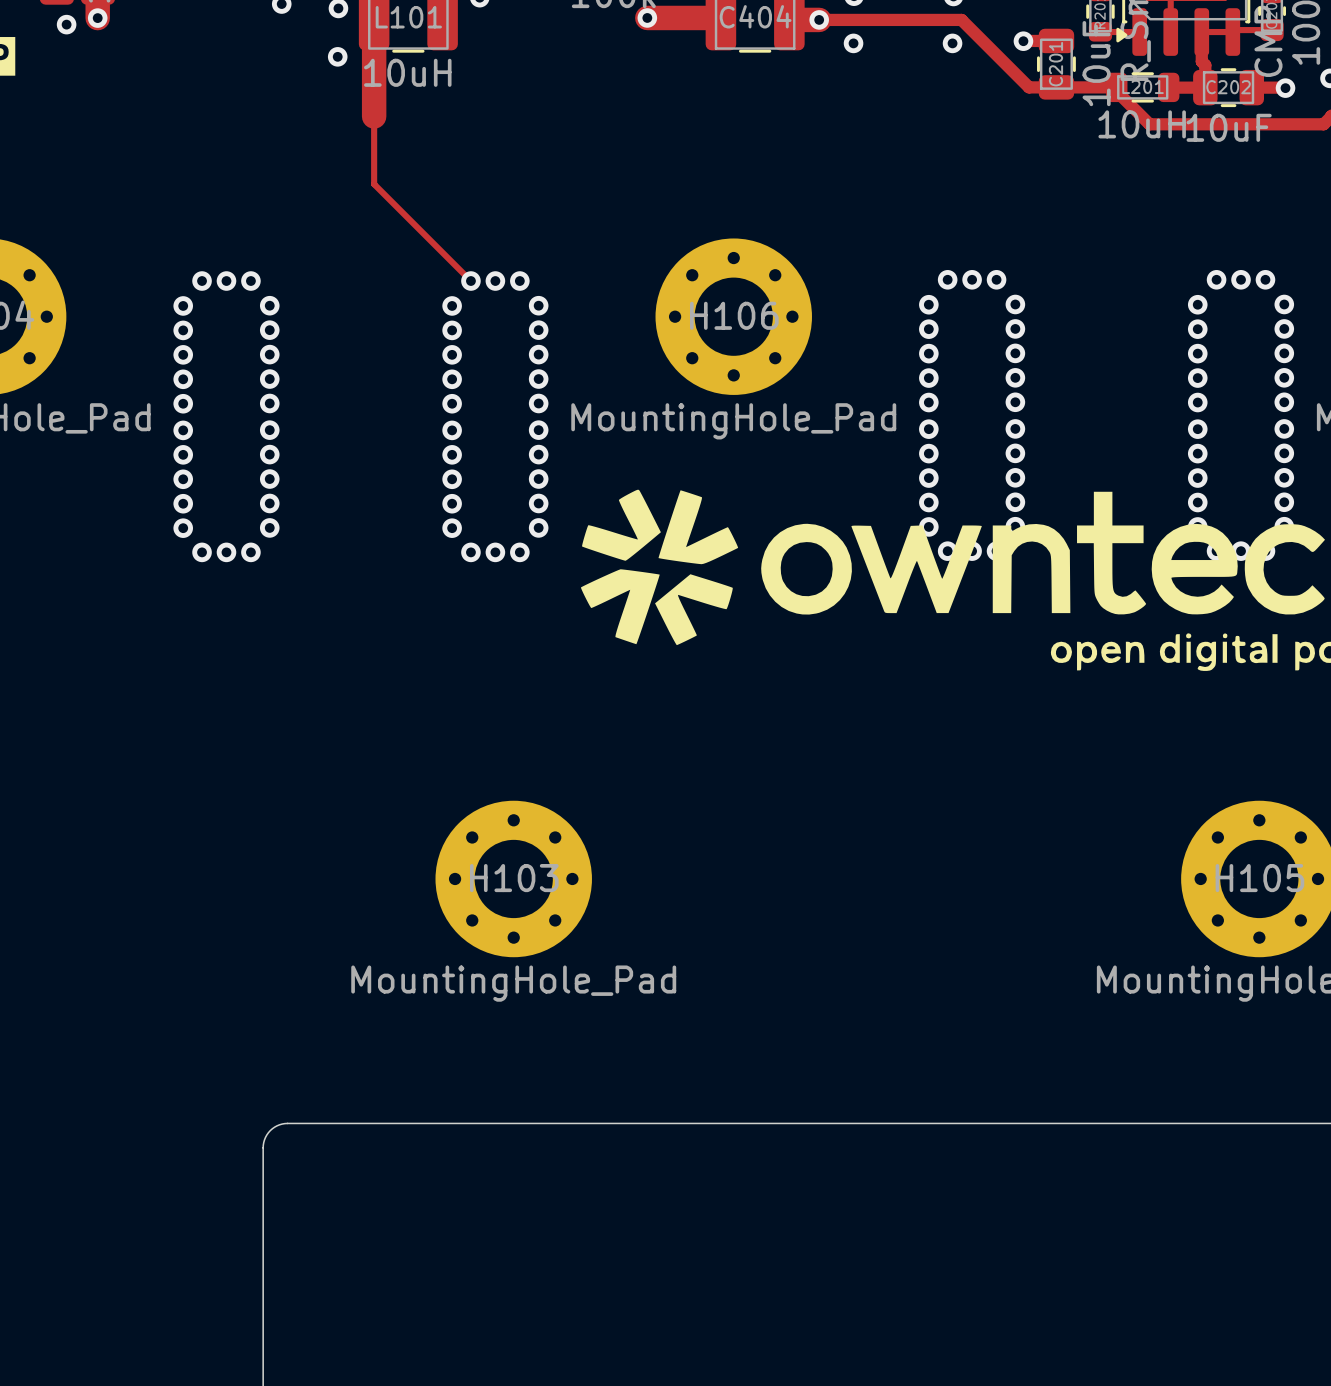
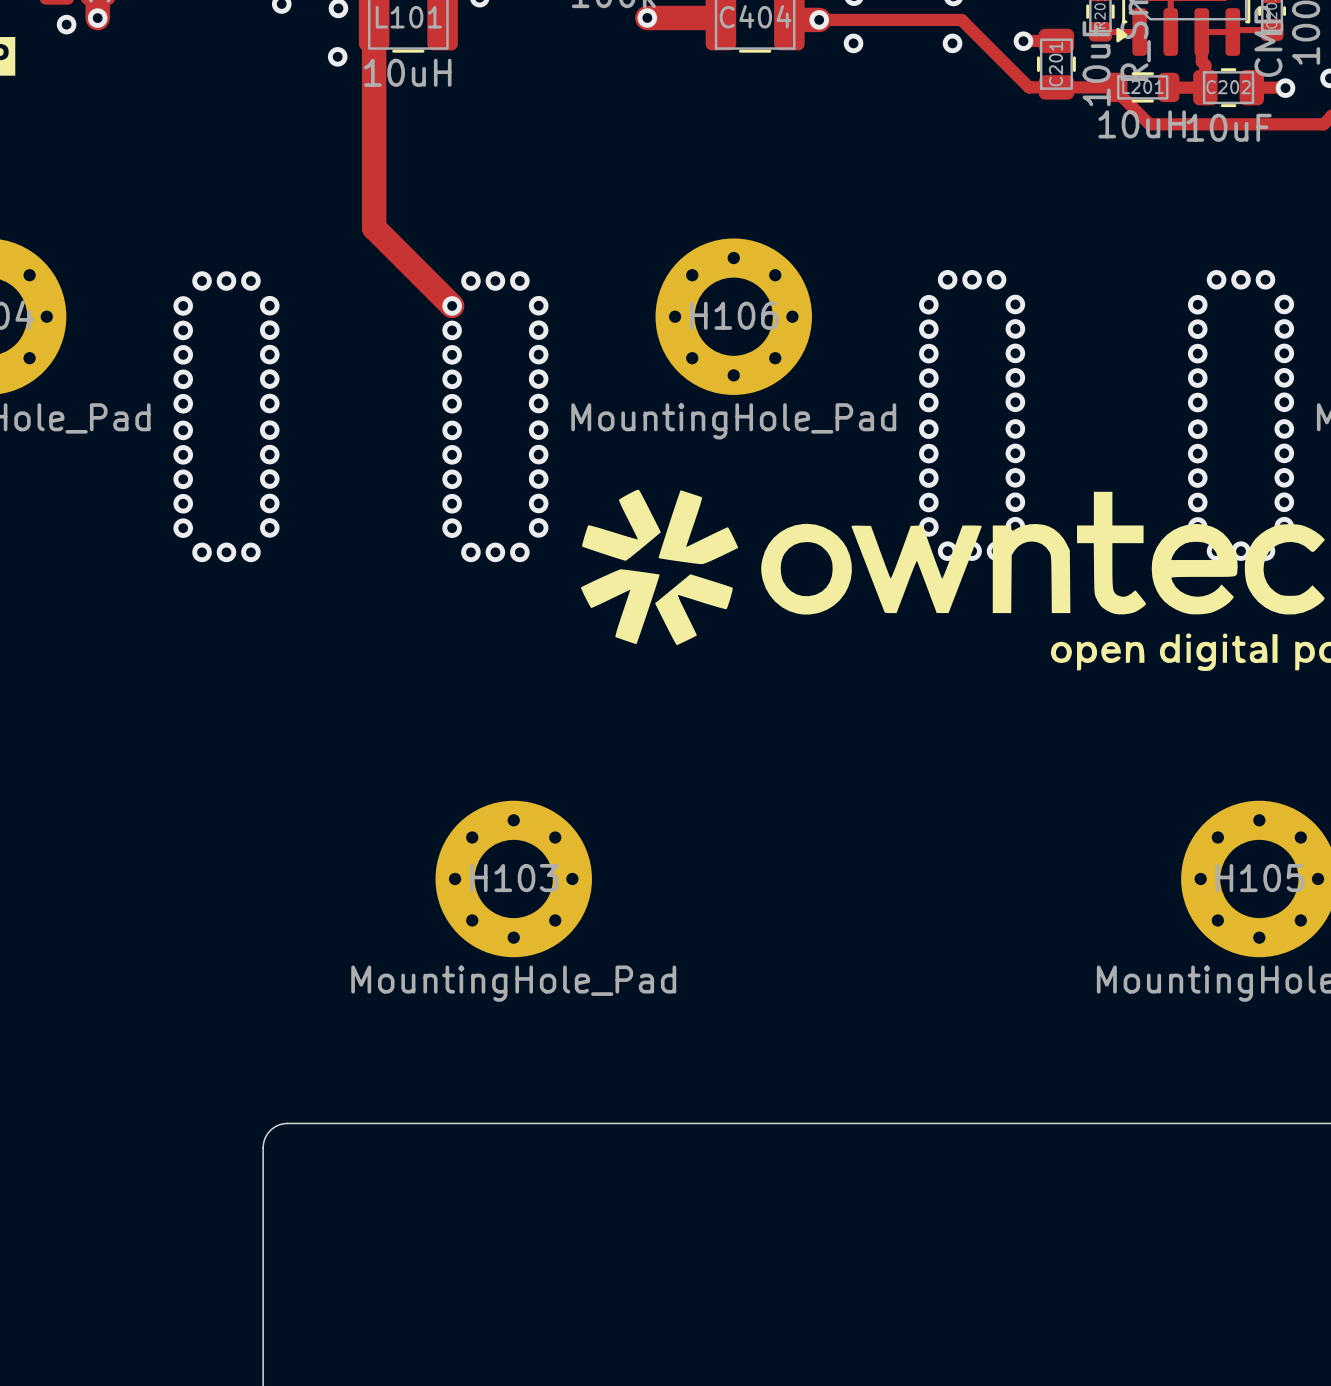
track width: thin (374, 116) (374, 184) -> thick (374, 116) (374, 184)
track: (374, 184) (470, 281) -> (374, 184) (374, 227) (452, 305)

